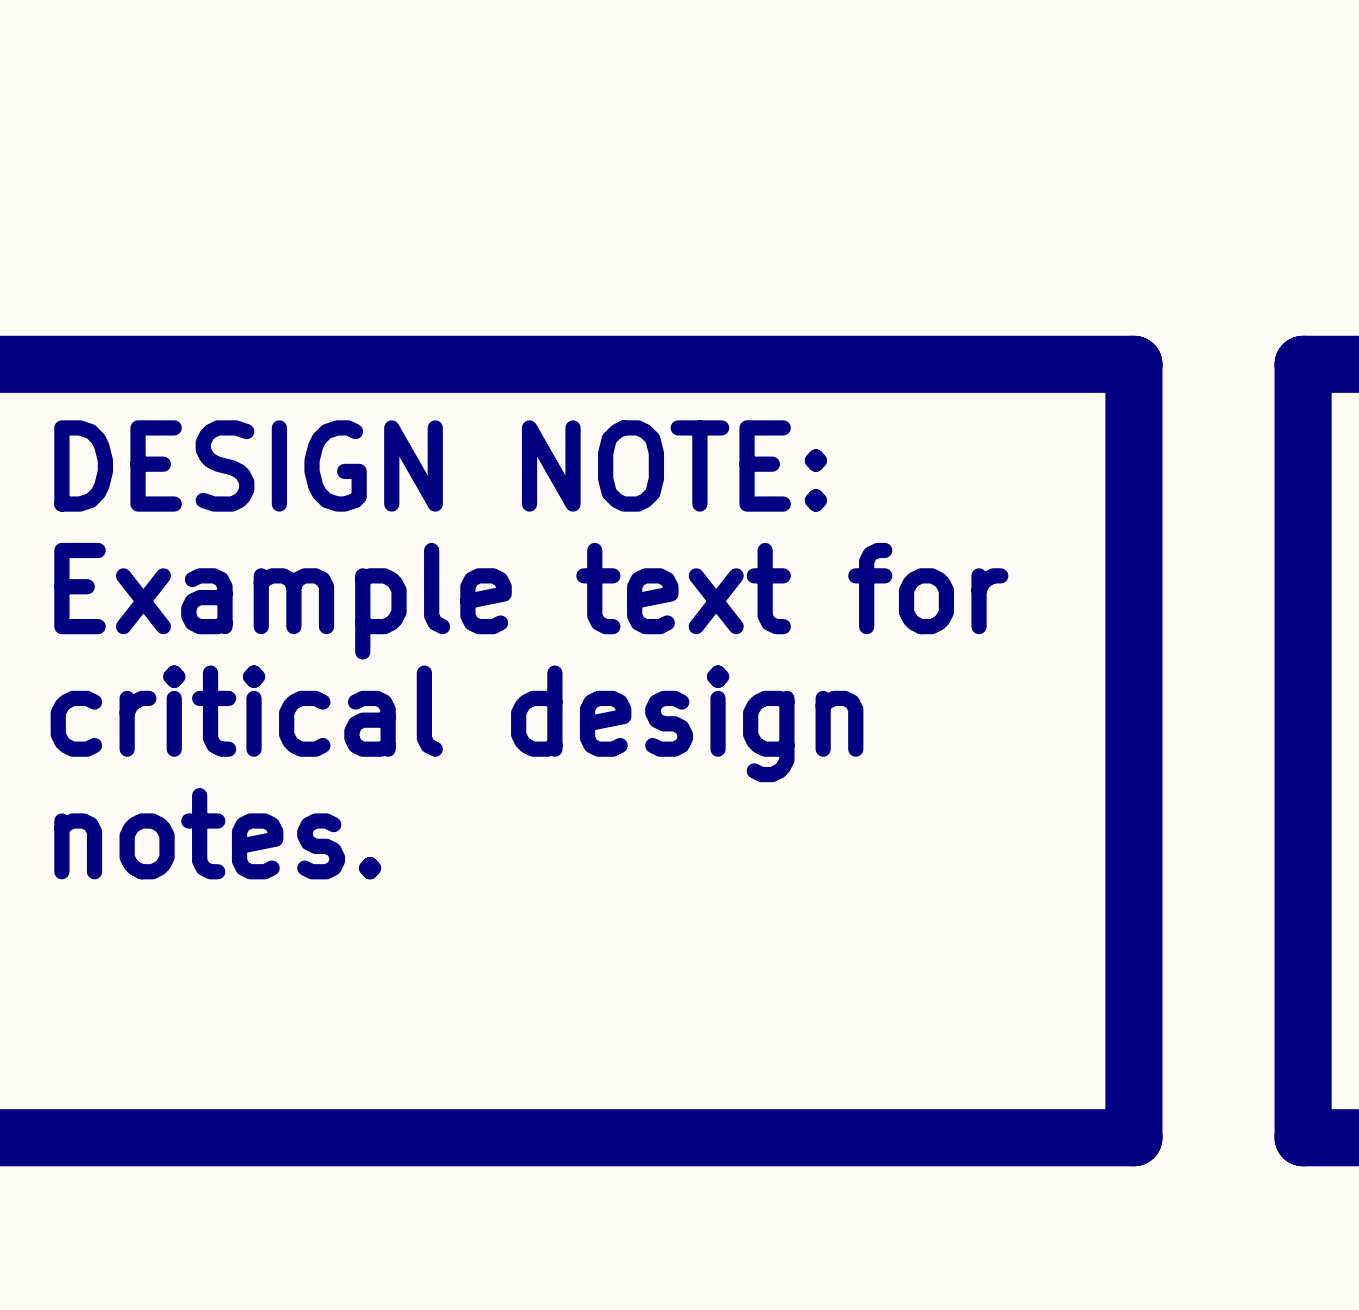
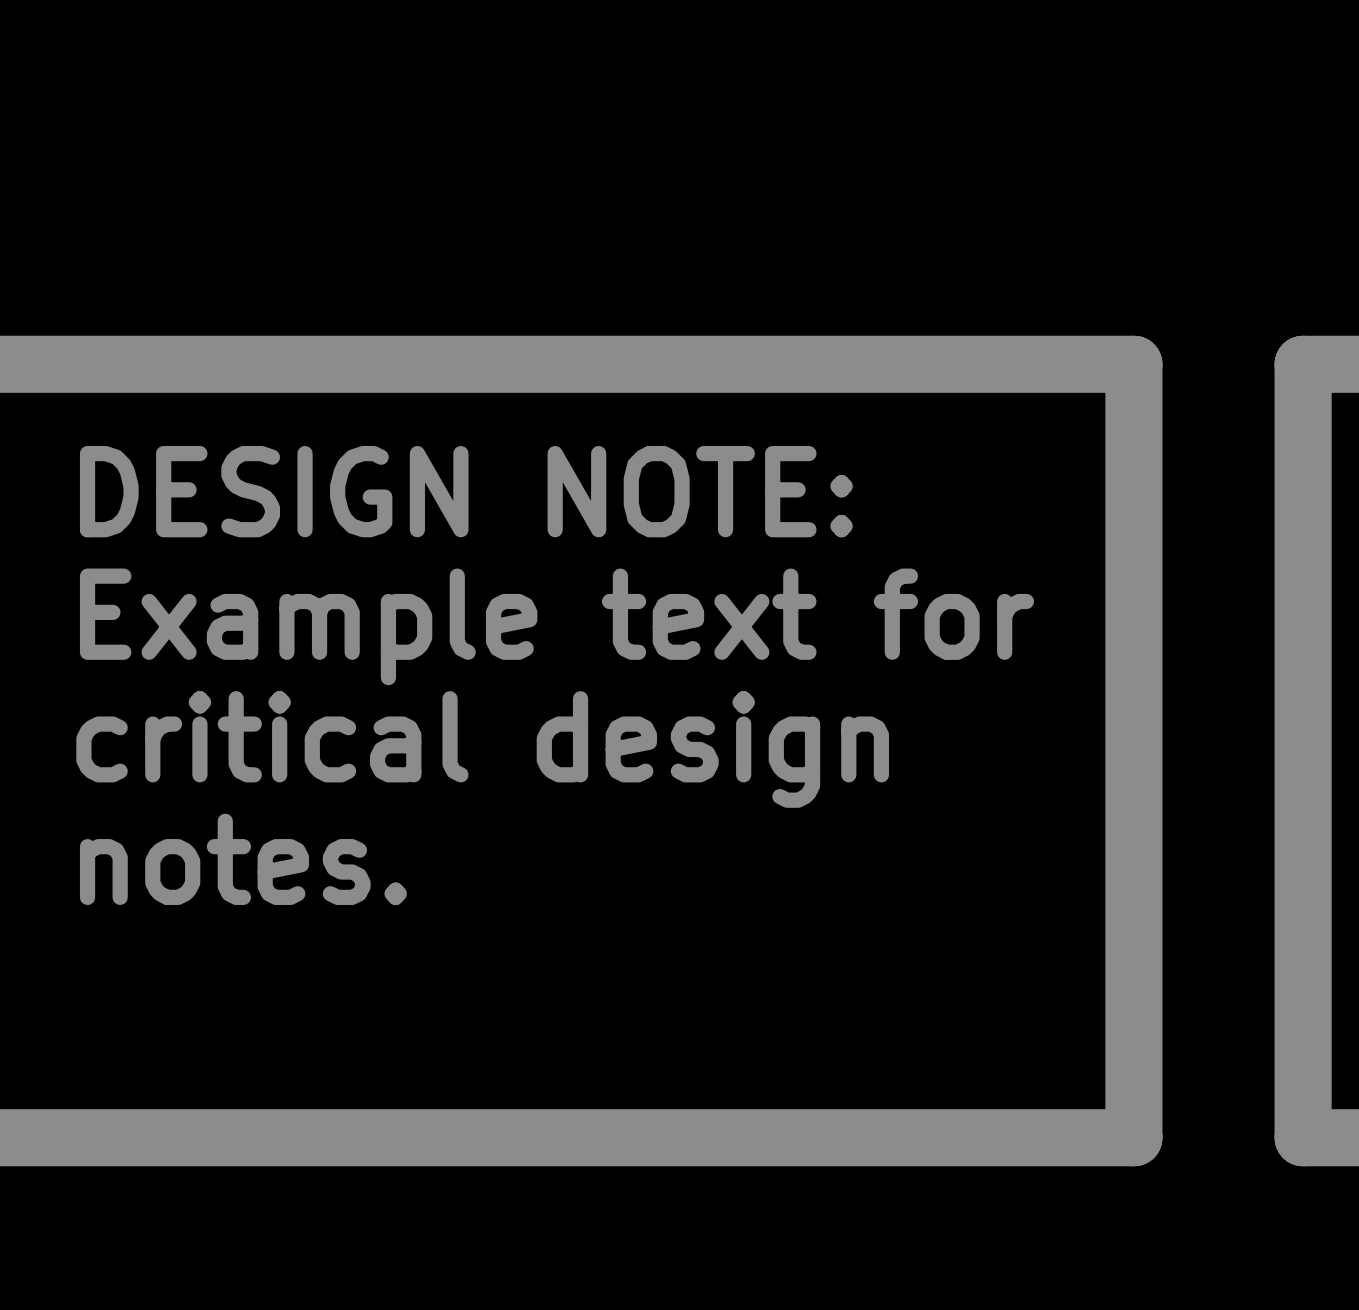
text position: DESIGN NOTE: (440, 465) -> DESIGN NOTE: (466, 491)
text position: Example text for (531, 601) -> Example text for (556, 626)
text position: critical design (457, 723) -> critical design (482, 749)
text position: notes. (217, 833) -> notes. (243, 859)

